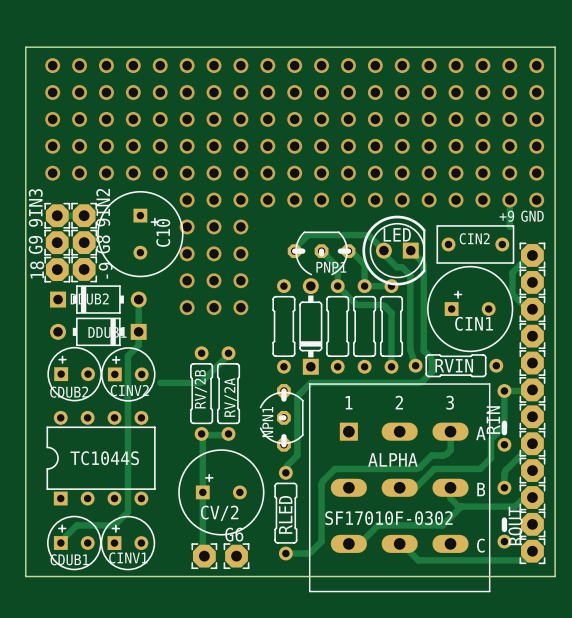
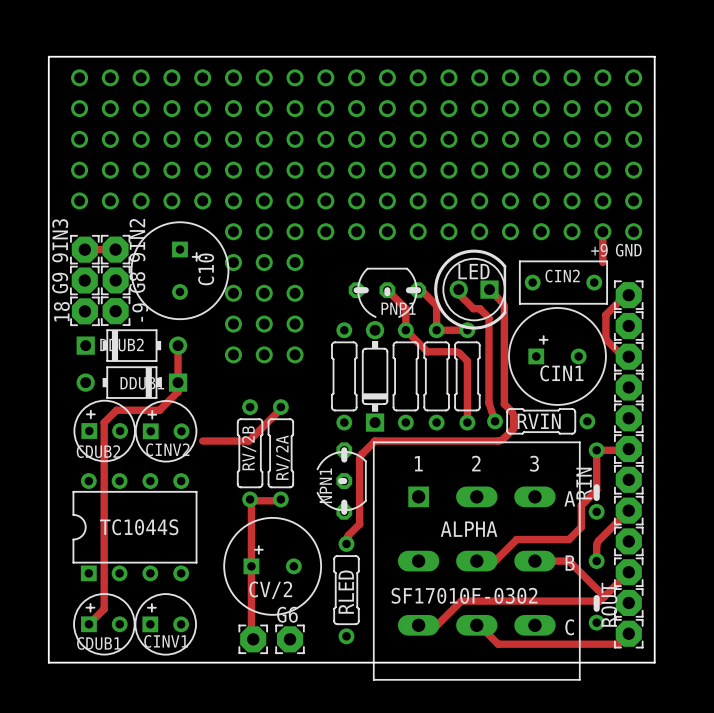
track: (383, 250) (367, 235) (308, 235) (296, 247) (294, 251) -> none
track: (138, 331) (138, 345) (127, 356) (127, 511) (114, 525) (76, 525) (60, 543) -> (178, 382) (178, 391) (159, 410) (116, 410) (104, 422) (104, 609) (88, 624)
track: (450, 431) (450, 450) (444, 455) (431, 455) (417, 468) (335, 468) (321, 484) (321, 541) (308, 553) (285, 553) -> none
track: (450, 487) (450, 498) (458, 506) (515, 506) (524, 497) (532, 497) -> (534, 561) (568, 561) (604, 596)
track: (461, 506) (442, 525) (378, 525) (359, 543) -> (628, 572) (599, 601) (461, 601) (437, 625) (430, 625)

